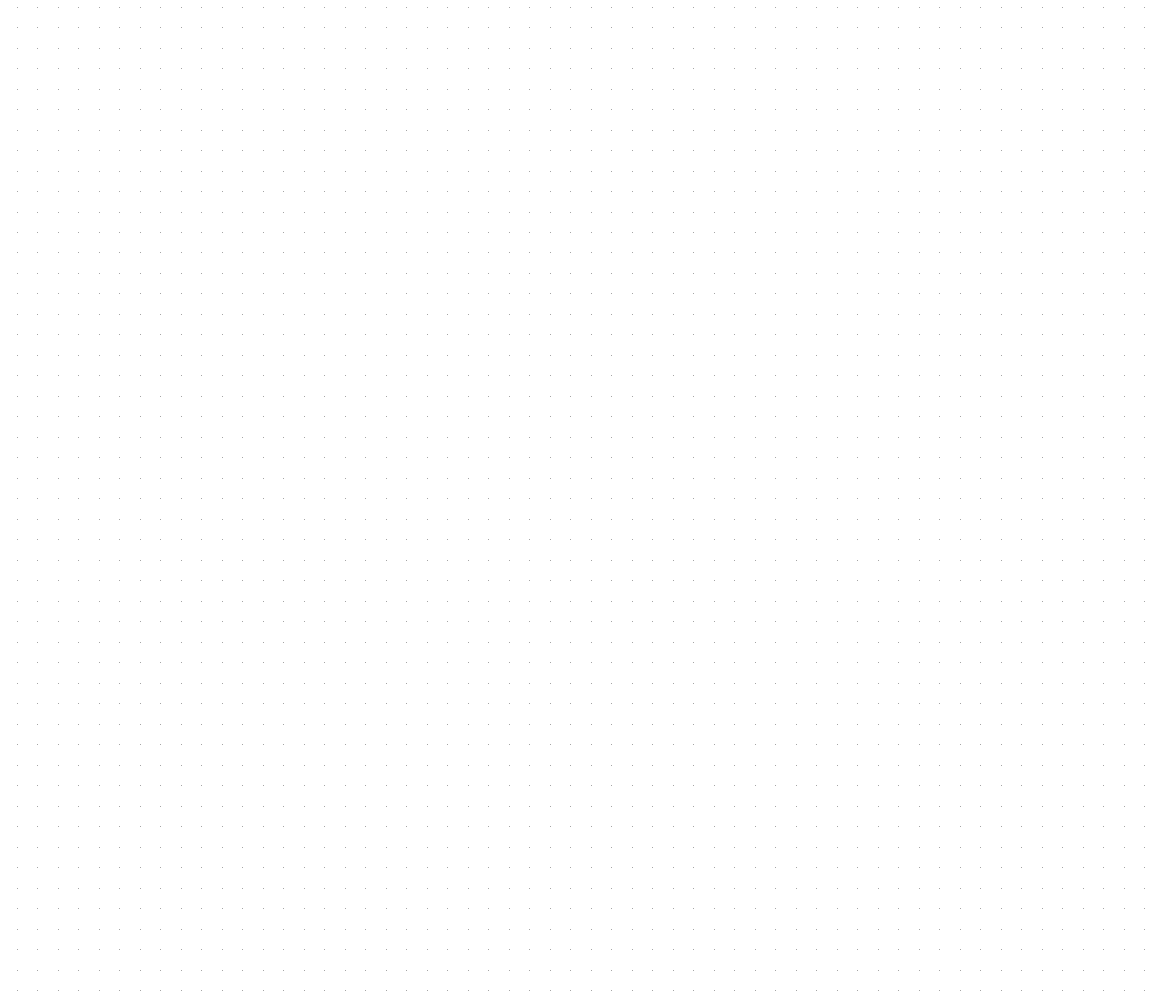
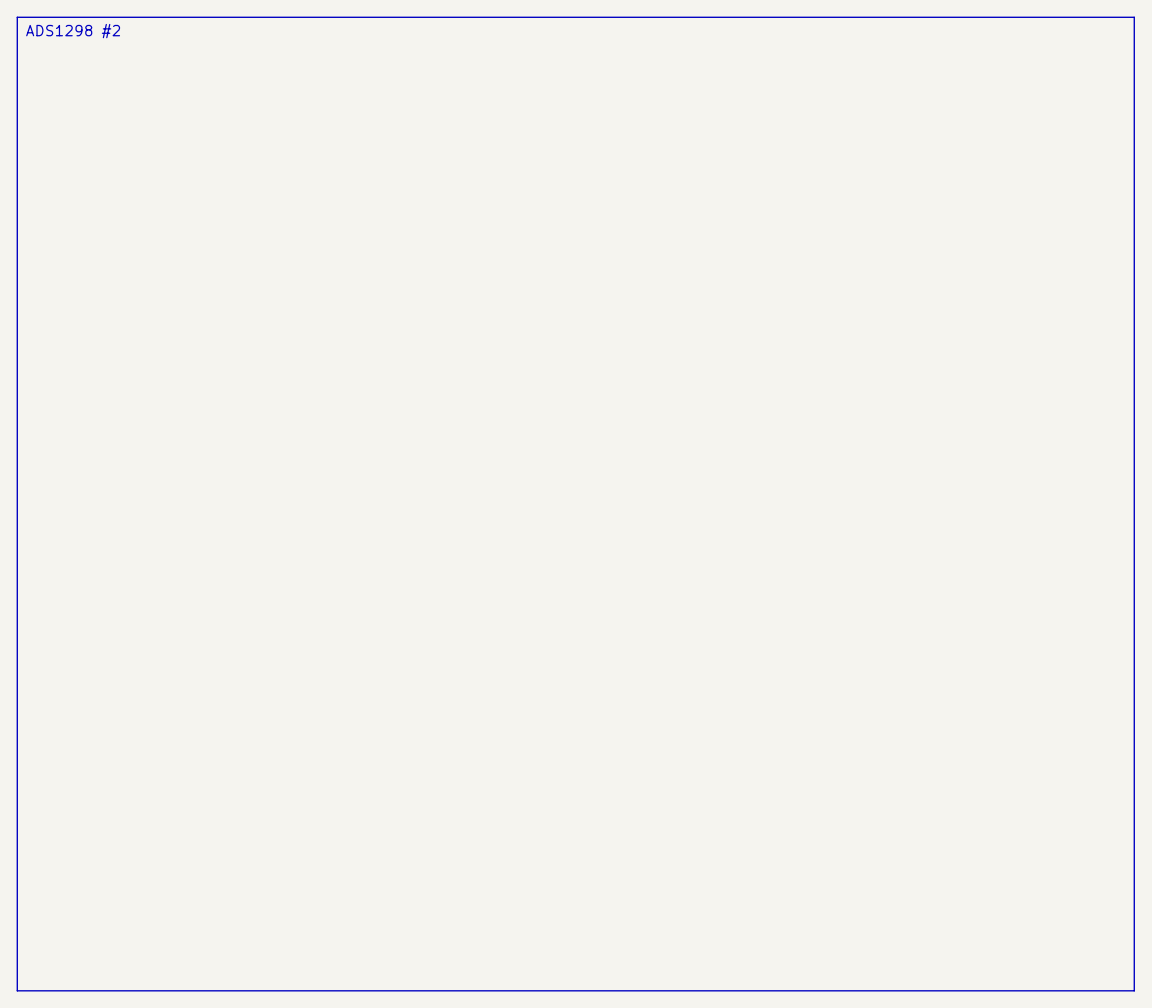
line: none -> (17, 17) (1134, 17) (1134, 990) (17, 990) (17, 17)
text: none -> ADS1298 #2 (73, 31)

